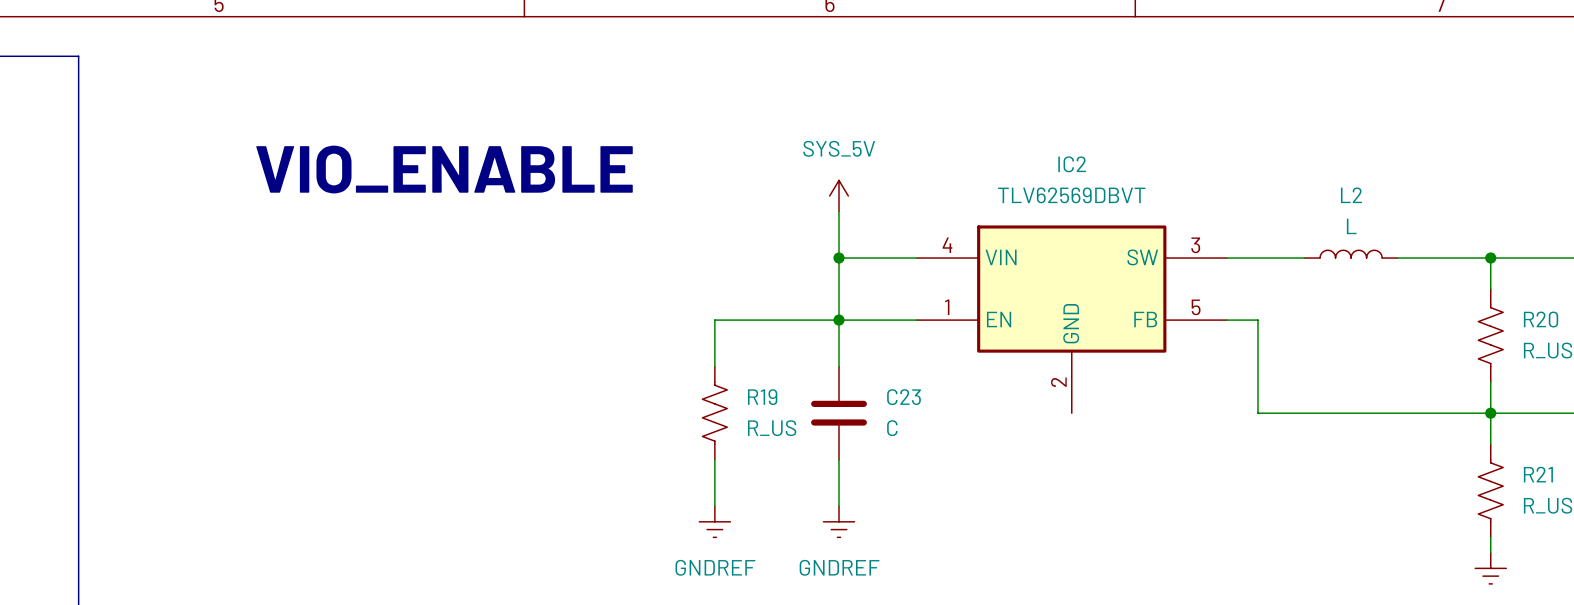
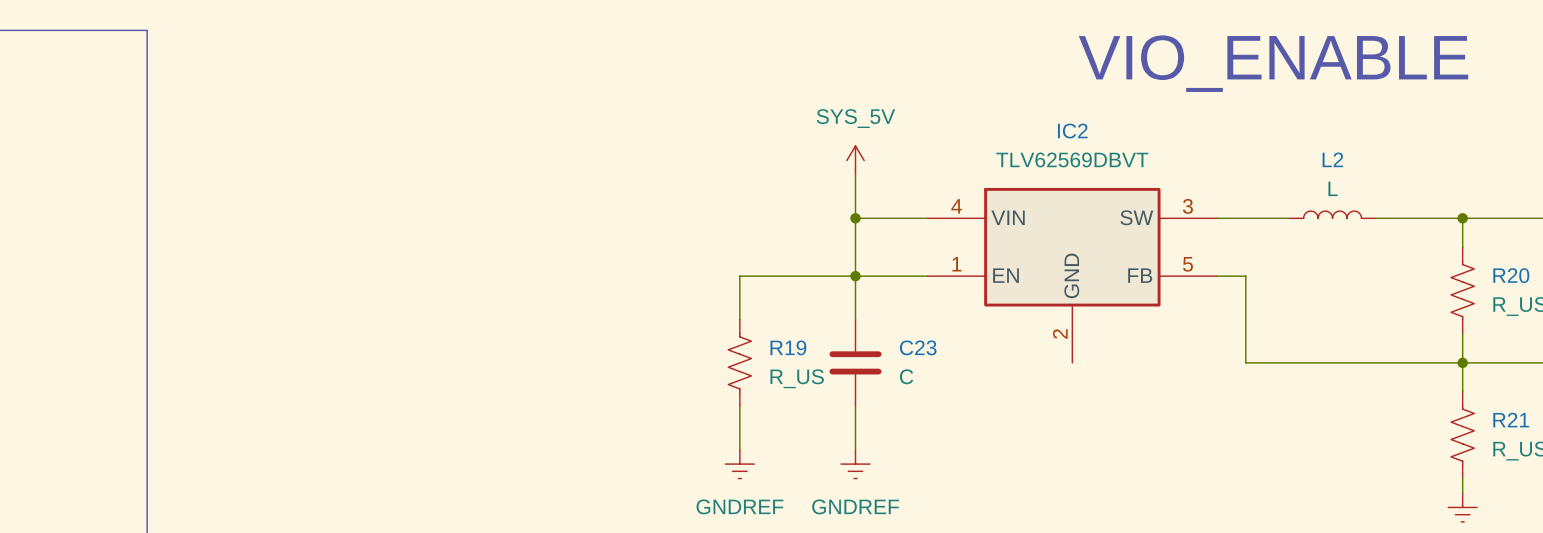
text: none -> VIO_ENABLE (1273, 63)
text: VIO_ENABLE (444, 169) -> none

